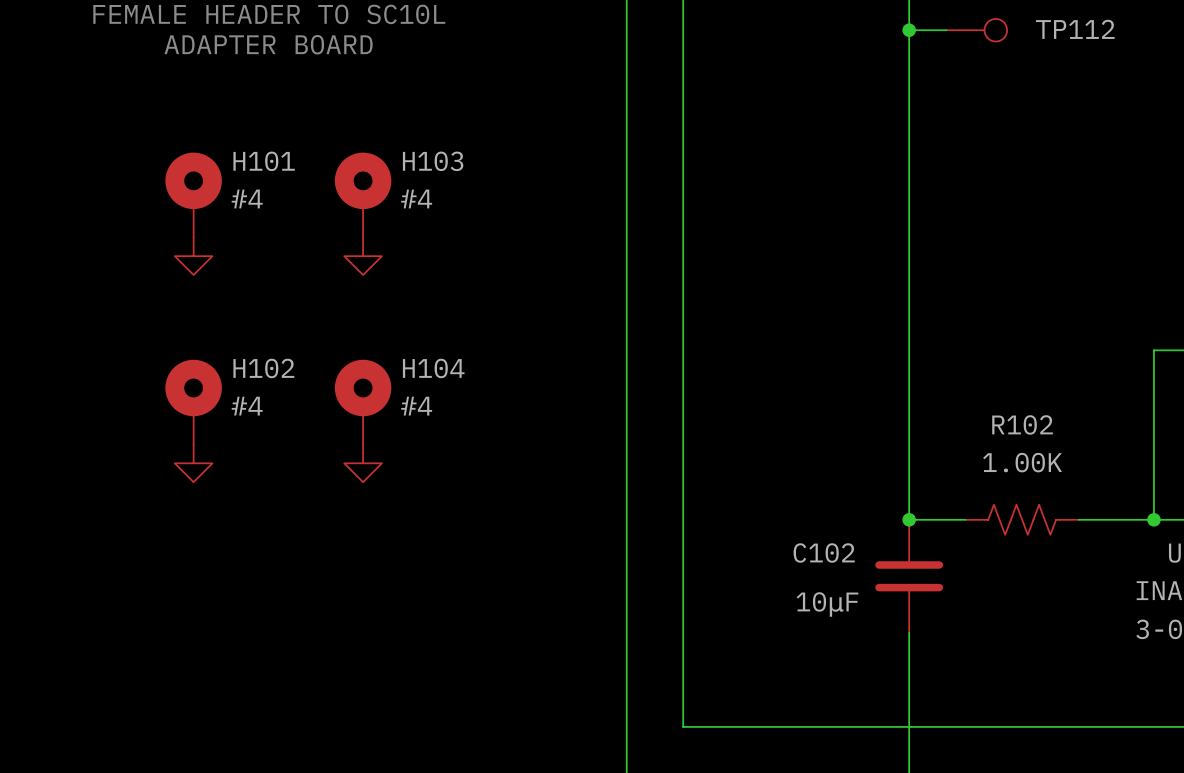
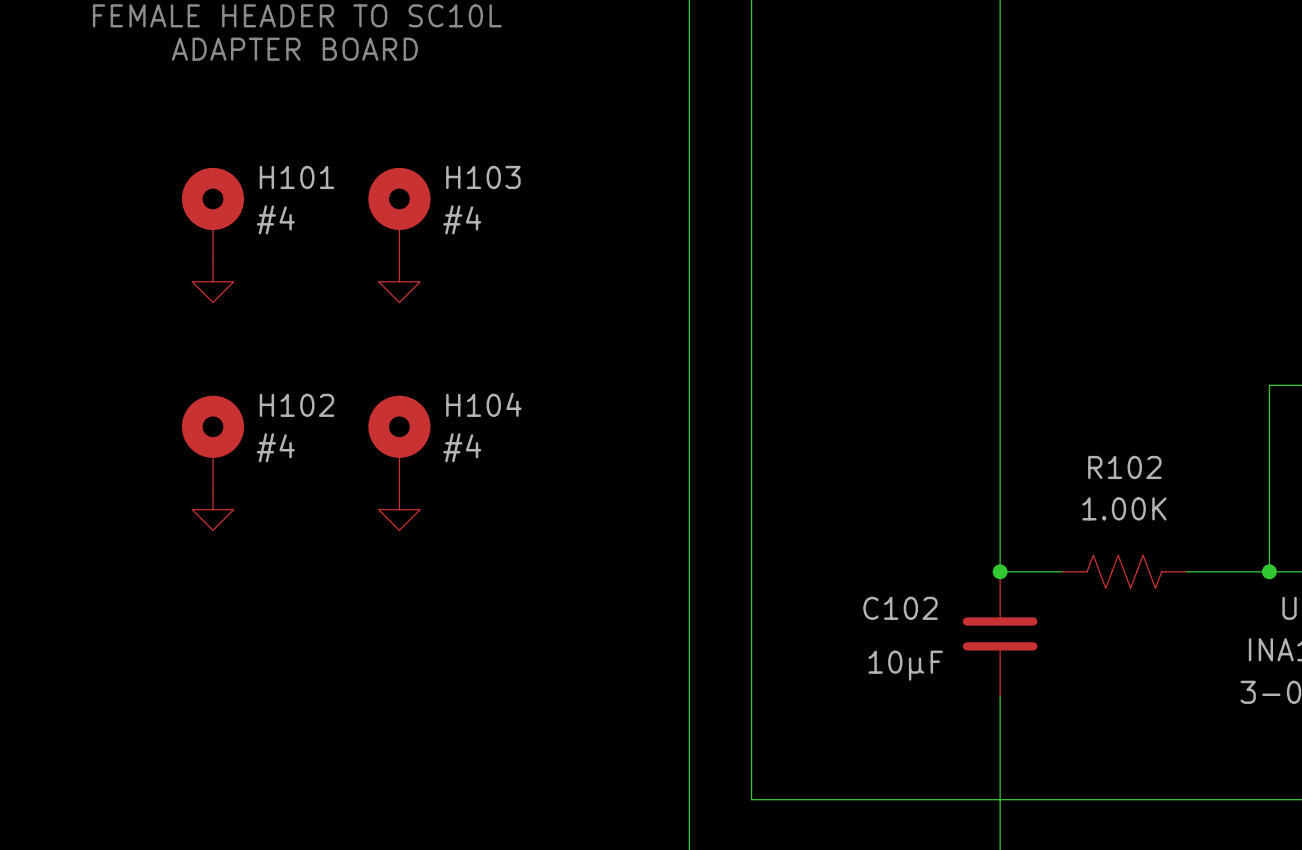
wire: (909, 30) (946, 30) -> none
junction: (909, 30) -> none
TP112: (976, 30) -> none

